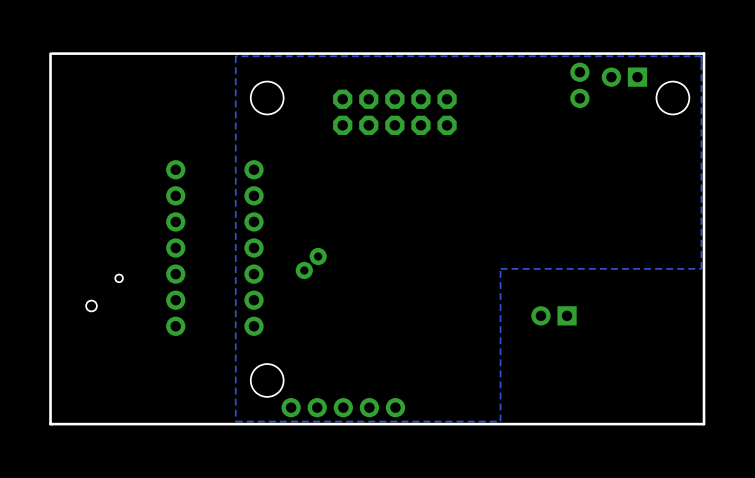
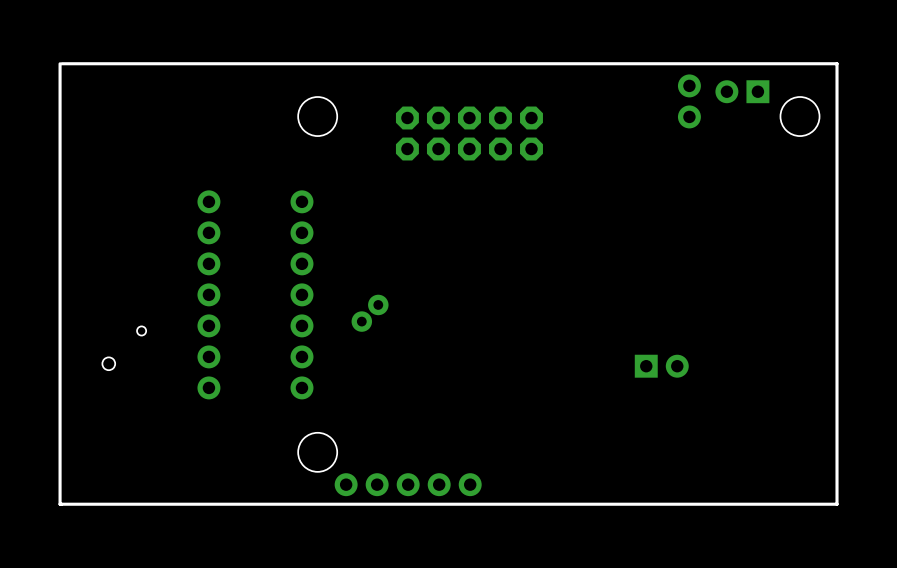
zone outline: (701, 56) (235, 56) (235, 421) (500, 421) (500, 268) (701, 268) (701, 56) -> none
part rotation: 0° (554, 315) -> 180° (661, 366)

